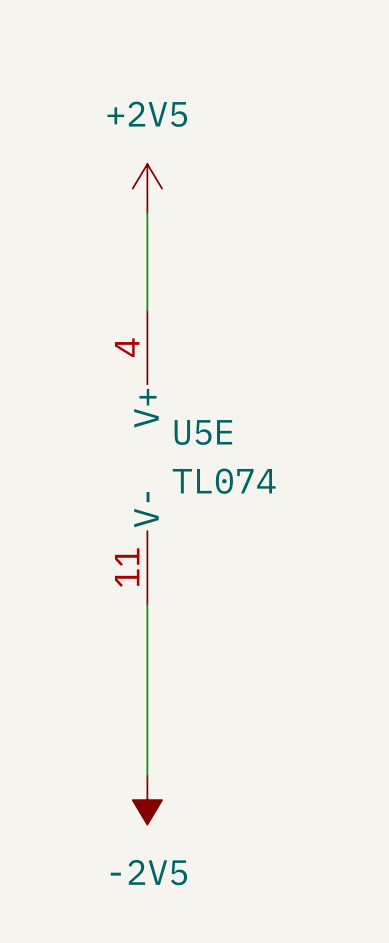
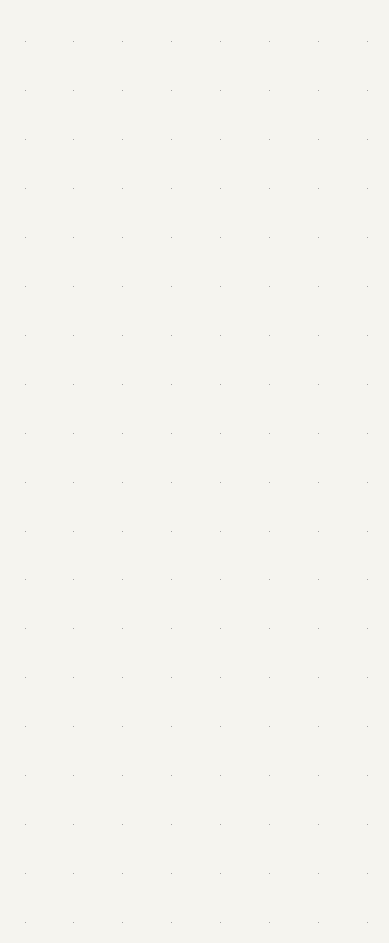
power symbol: +2V5 (147, 188) -> none
wire: (147, 213) (147, 310) -> none
U5E: TL074 (147, 457) -> none
wire: (147, 604) (147, 775) -> none
power symbol: -2V5 (147, 800) -> none

